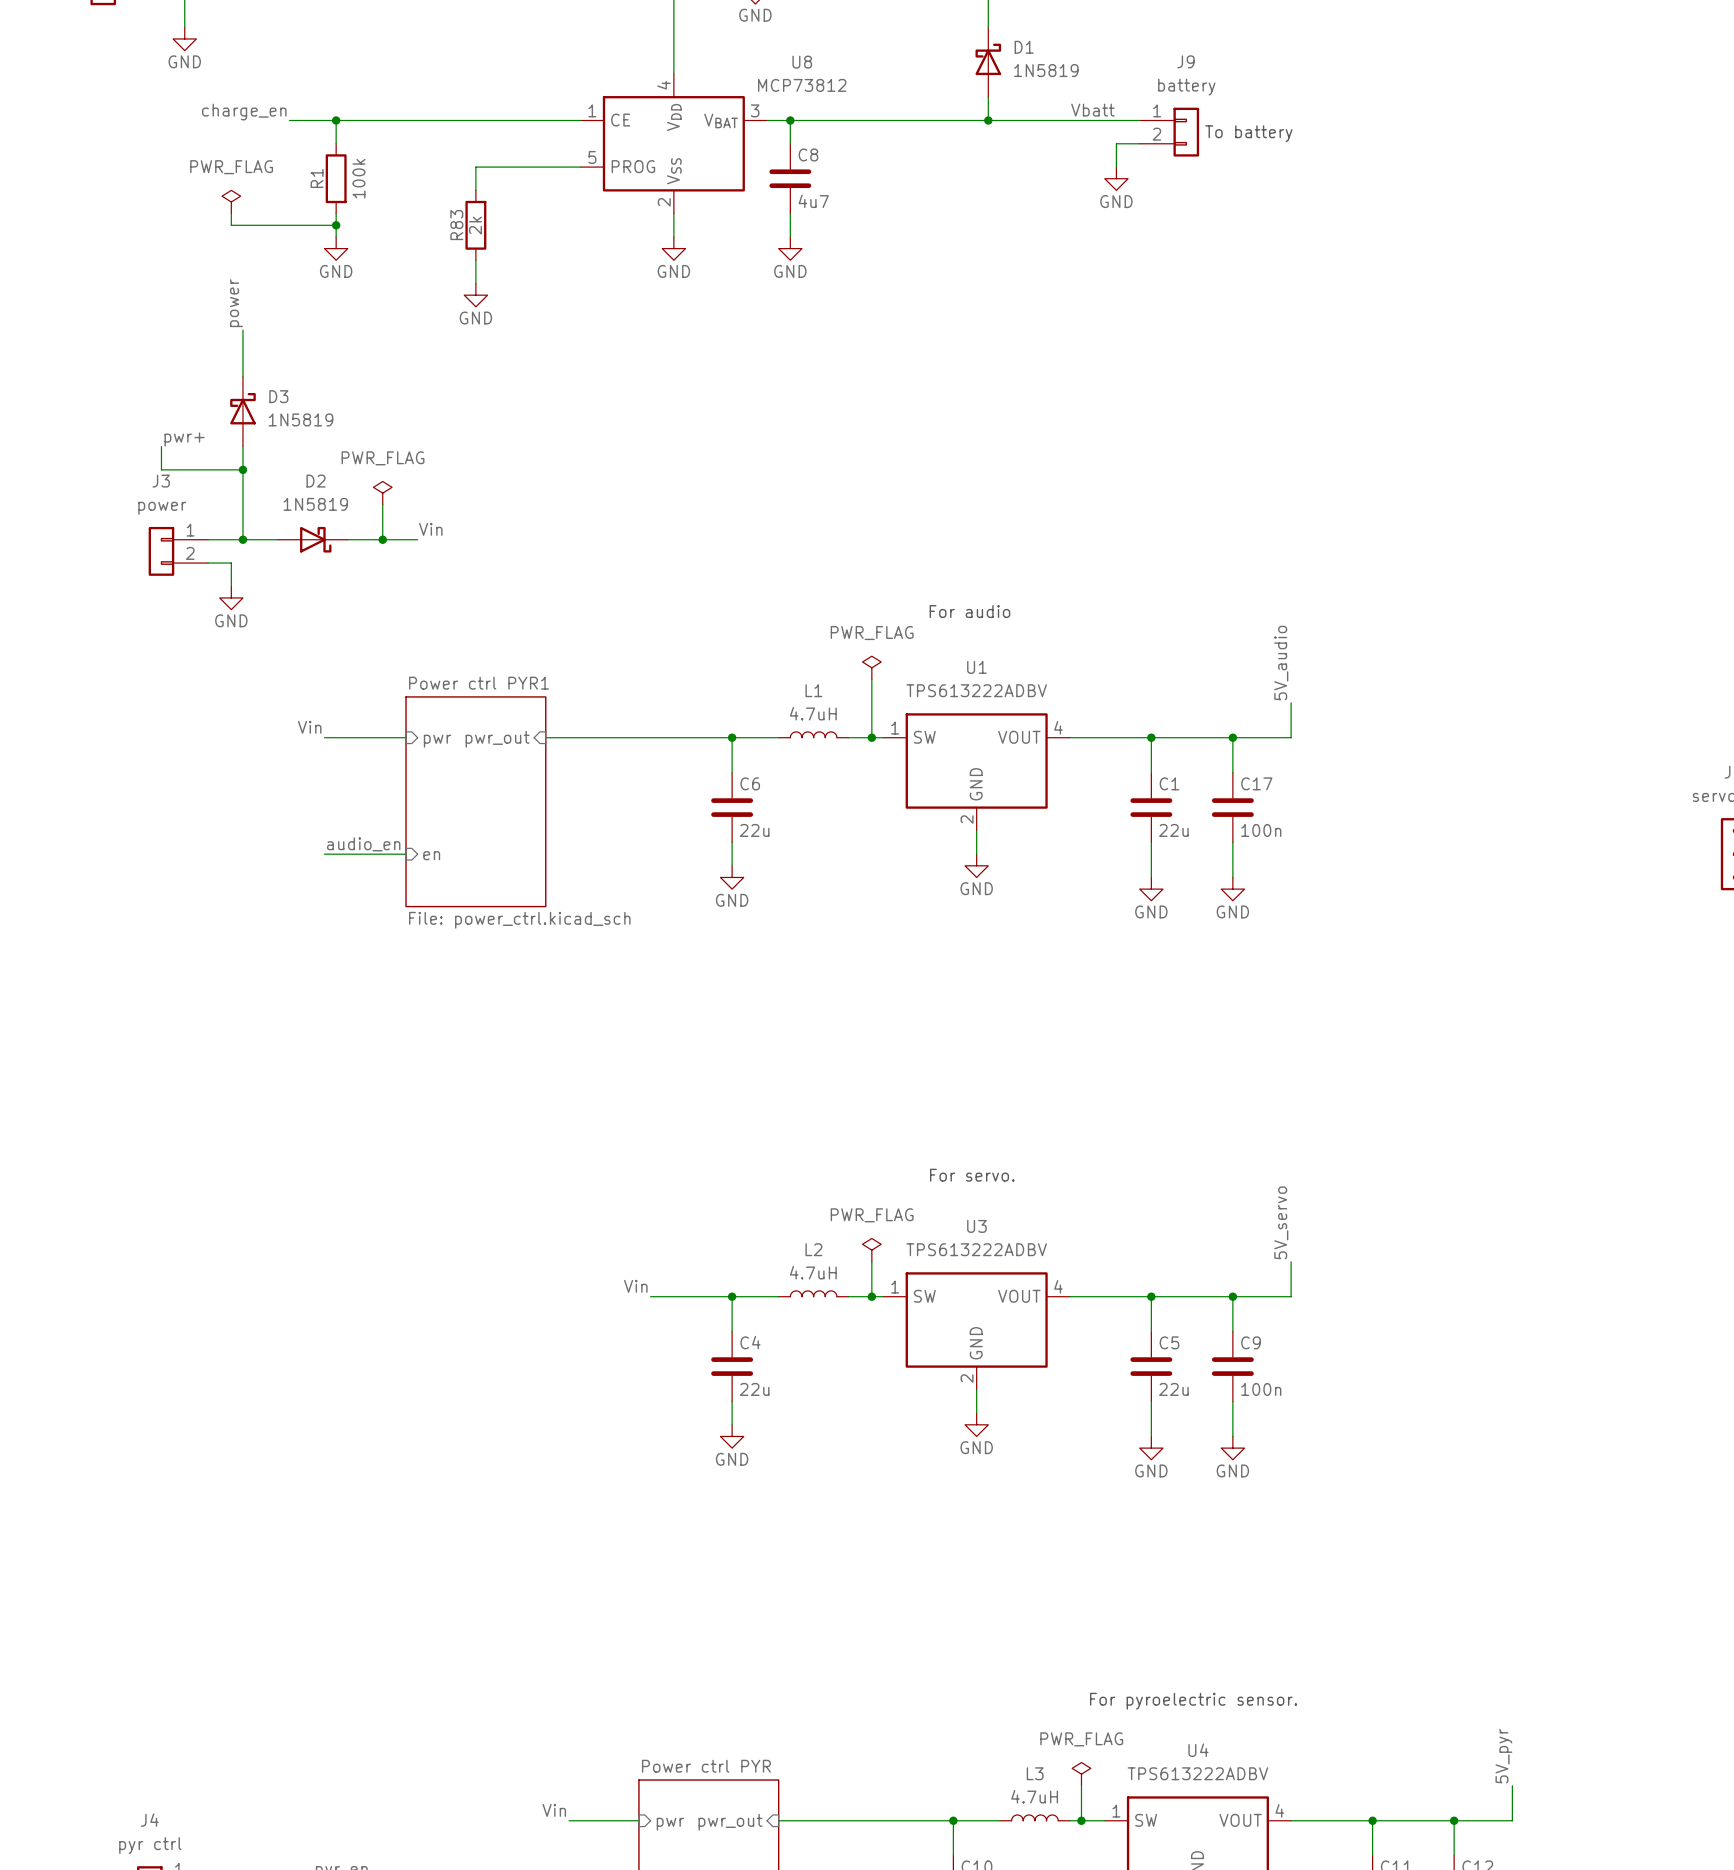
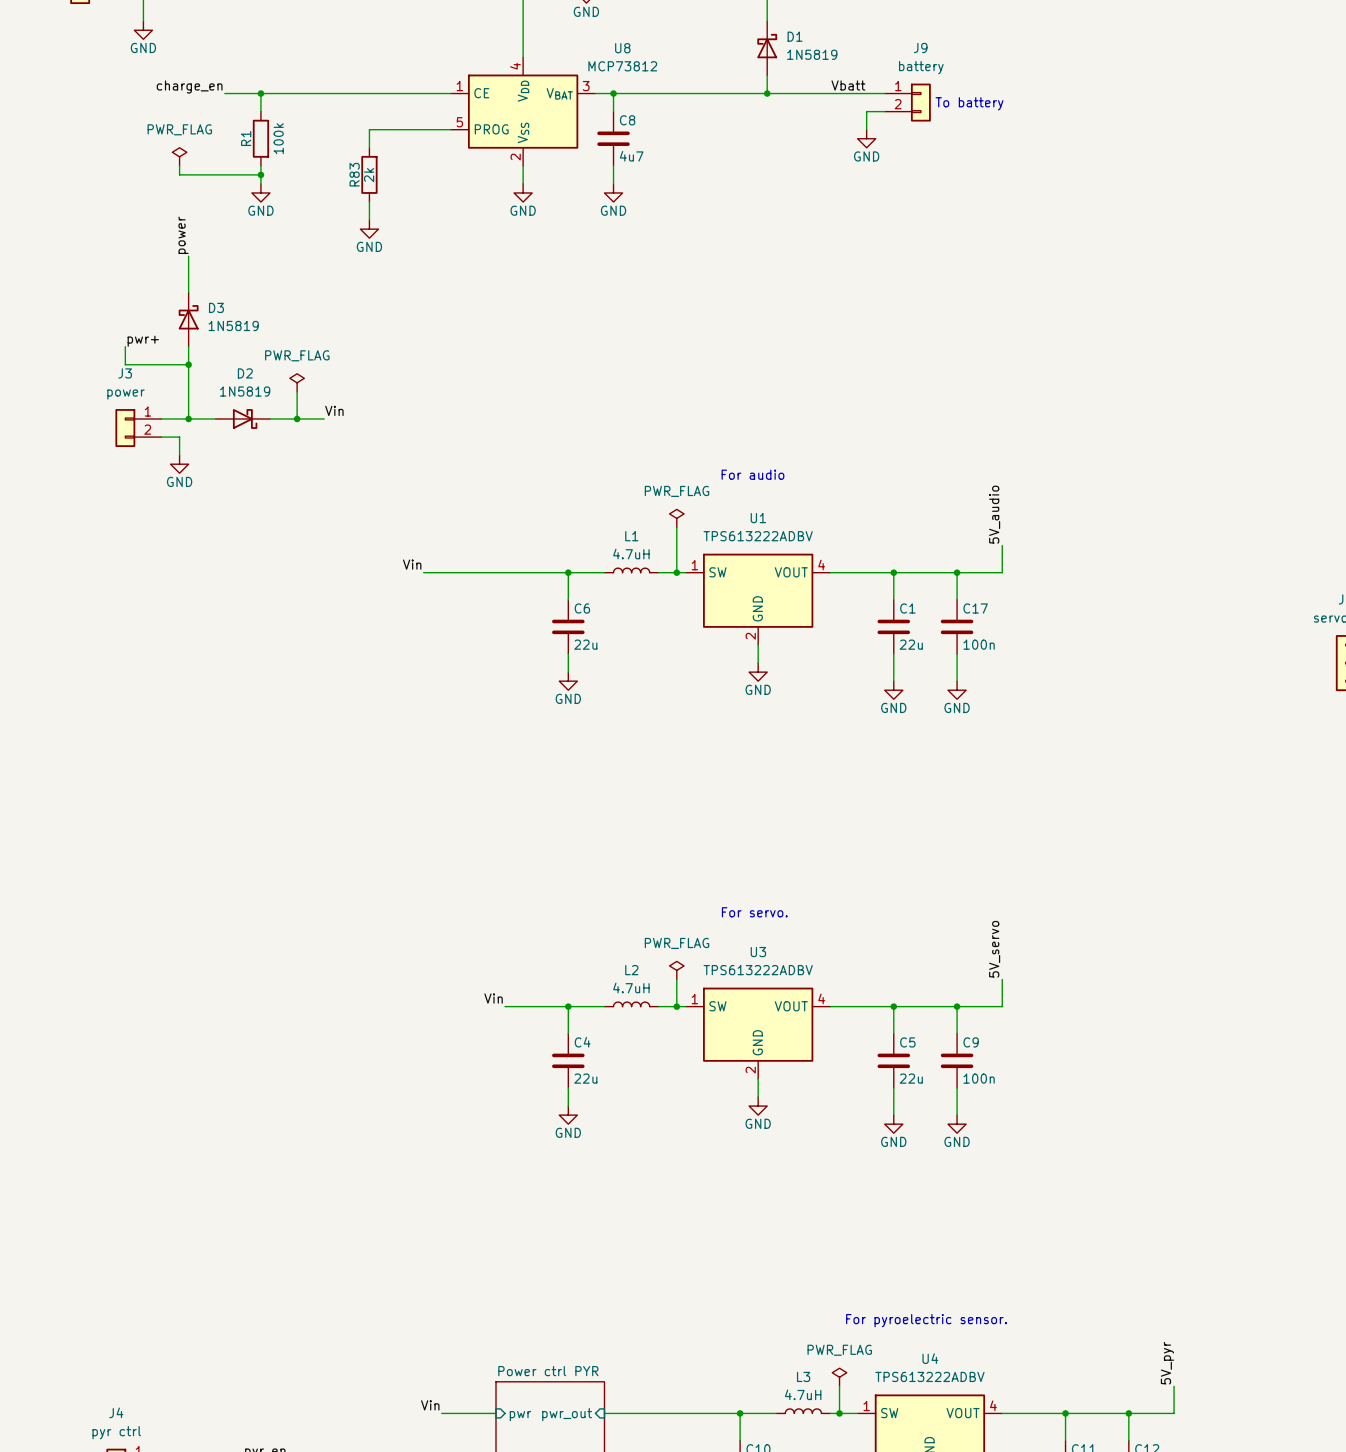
label position: Vin (309, 727) -> Vin (412, 564)
wire: (324, 737) (406, 737) -> none
sheet pin: pwr_out (497, 739) -> none
sheet pin: pwr (437, 741) -> none
sheet Power ctrl PYR1: File: power_ctrl.kicad_sch (475, 801) -> none
label: audio_en (363, 844) -> none
wire: (324, 854) (406, 854) -> none
sheet pin: en (431, 855) -> none

